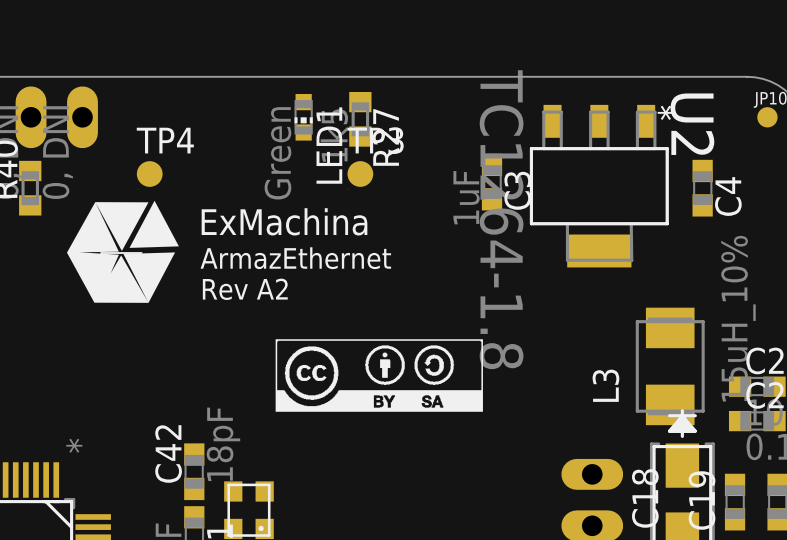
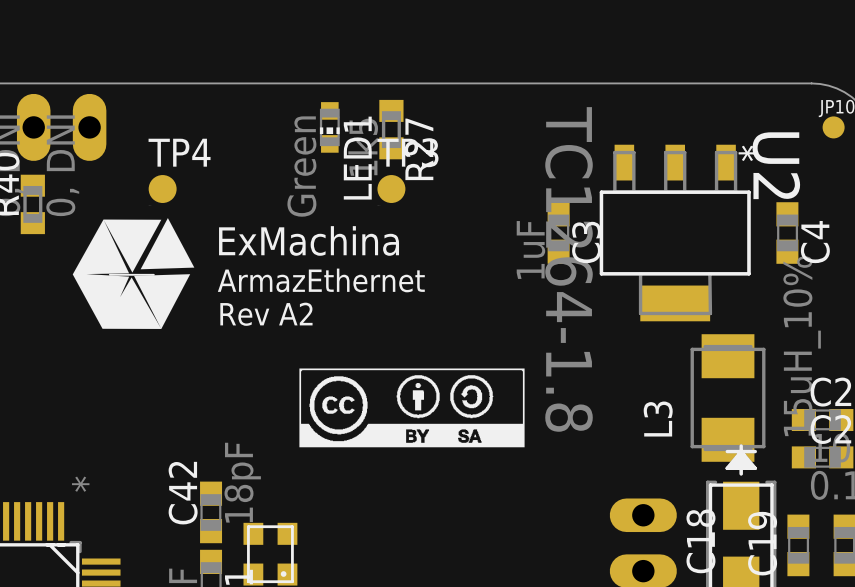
C3 position: (492, 182) -> (558, 233)
U2 position: (599, 186) -> (675, 233)
C4 position: (702, 188) -> (787, 233)

